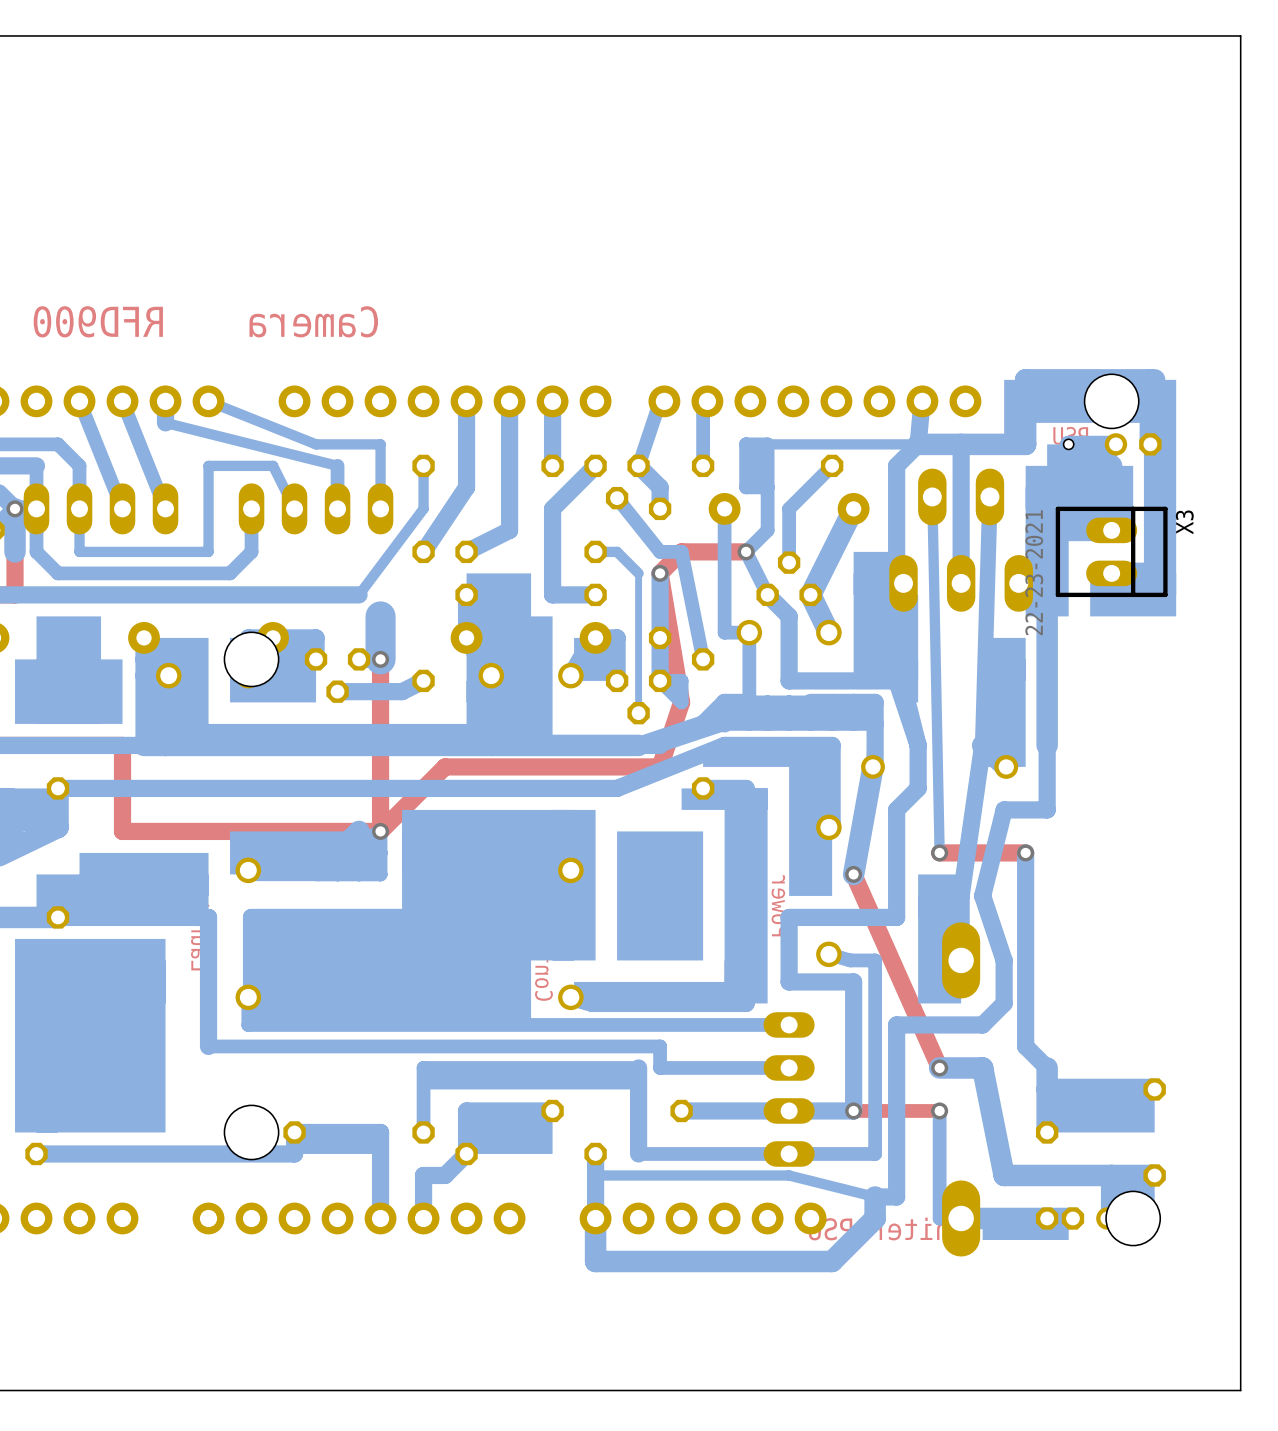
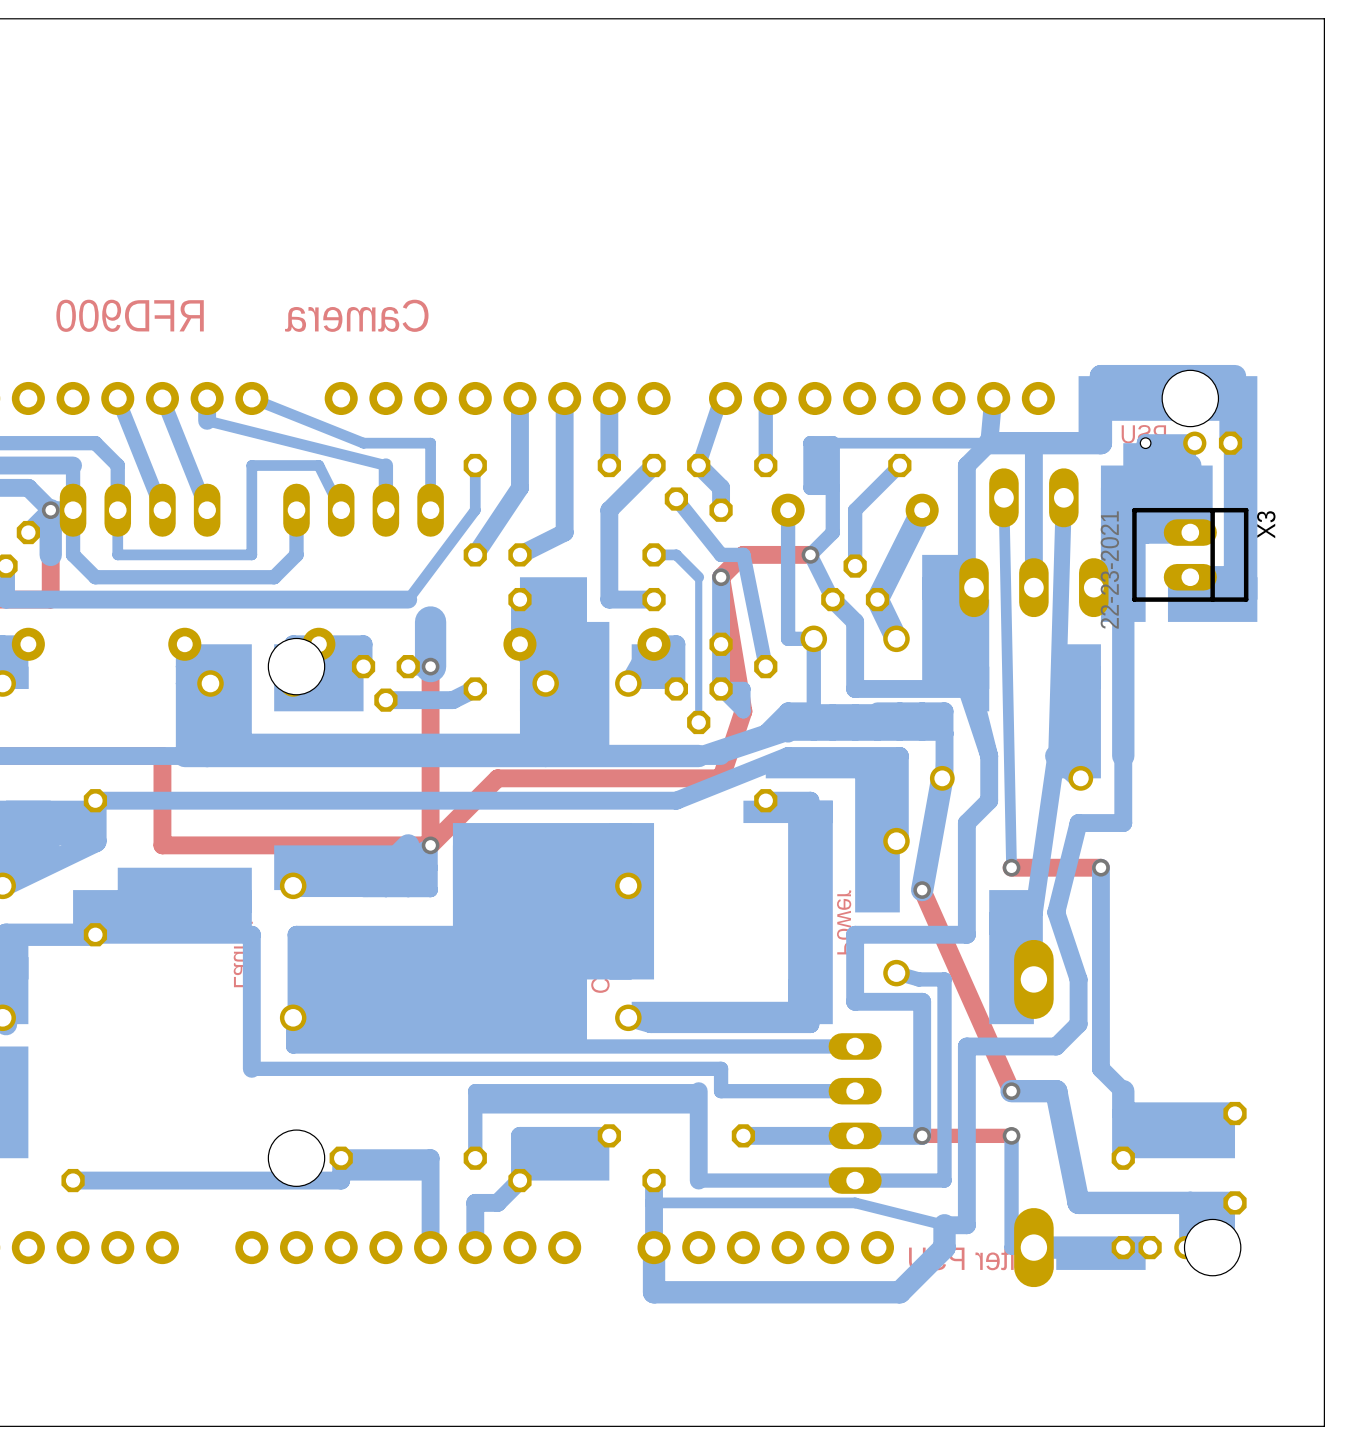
drawing: [15, 616, 123, 724] -> none
drawing: [617, 831, 704, 961] -> none
drawing: [15, 938, 166, 1133] -> none

